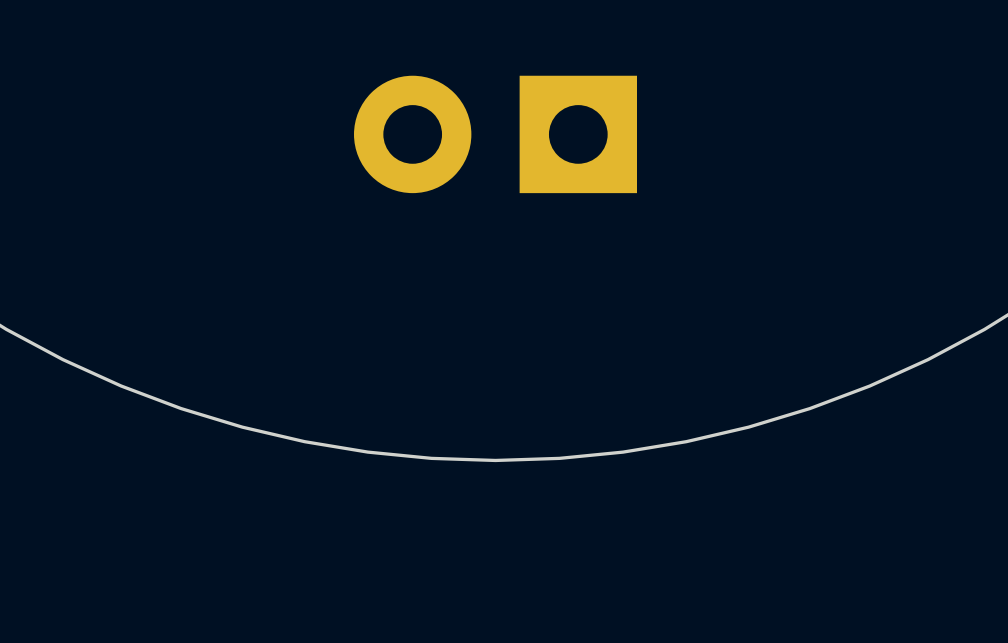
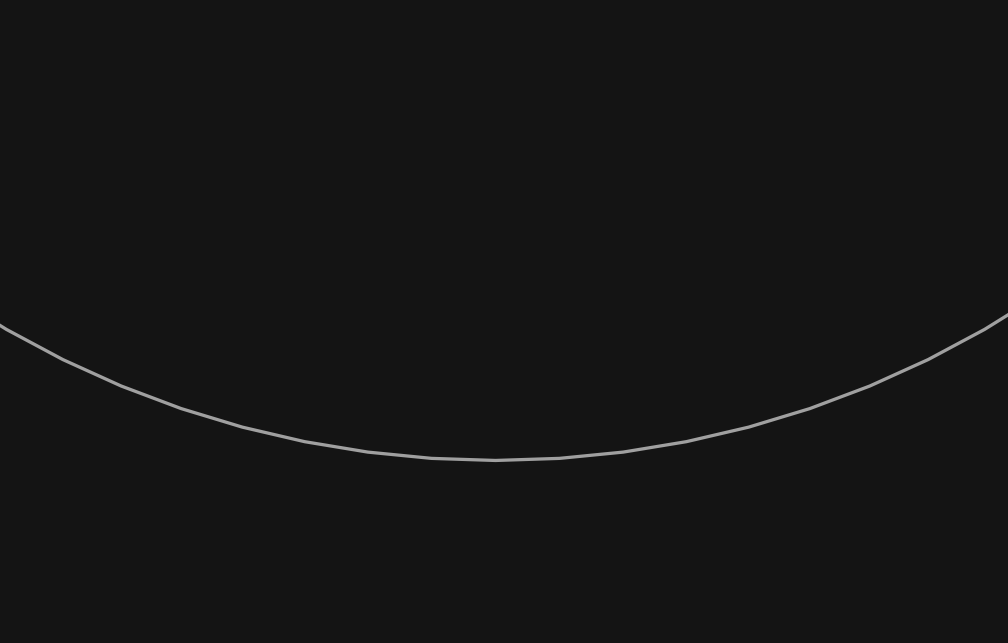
part: (495, 134) -> none

